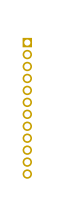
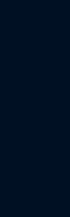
part: (27, 108) -> none

